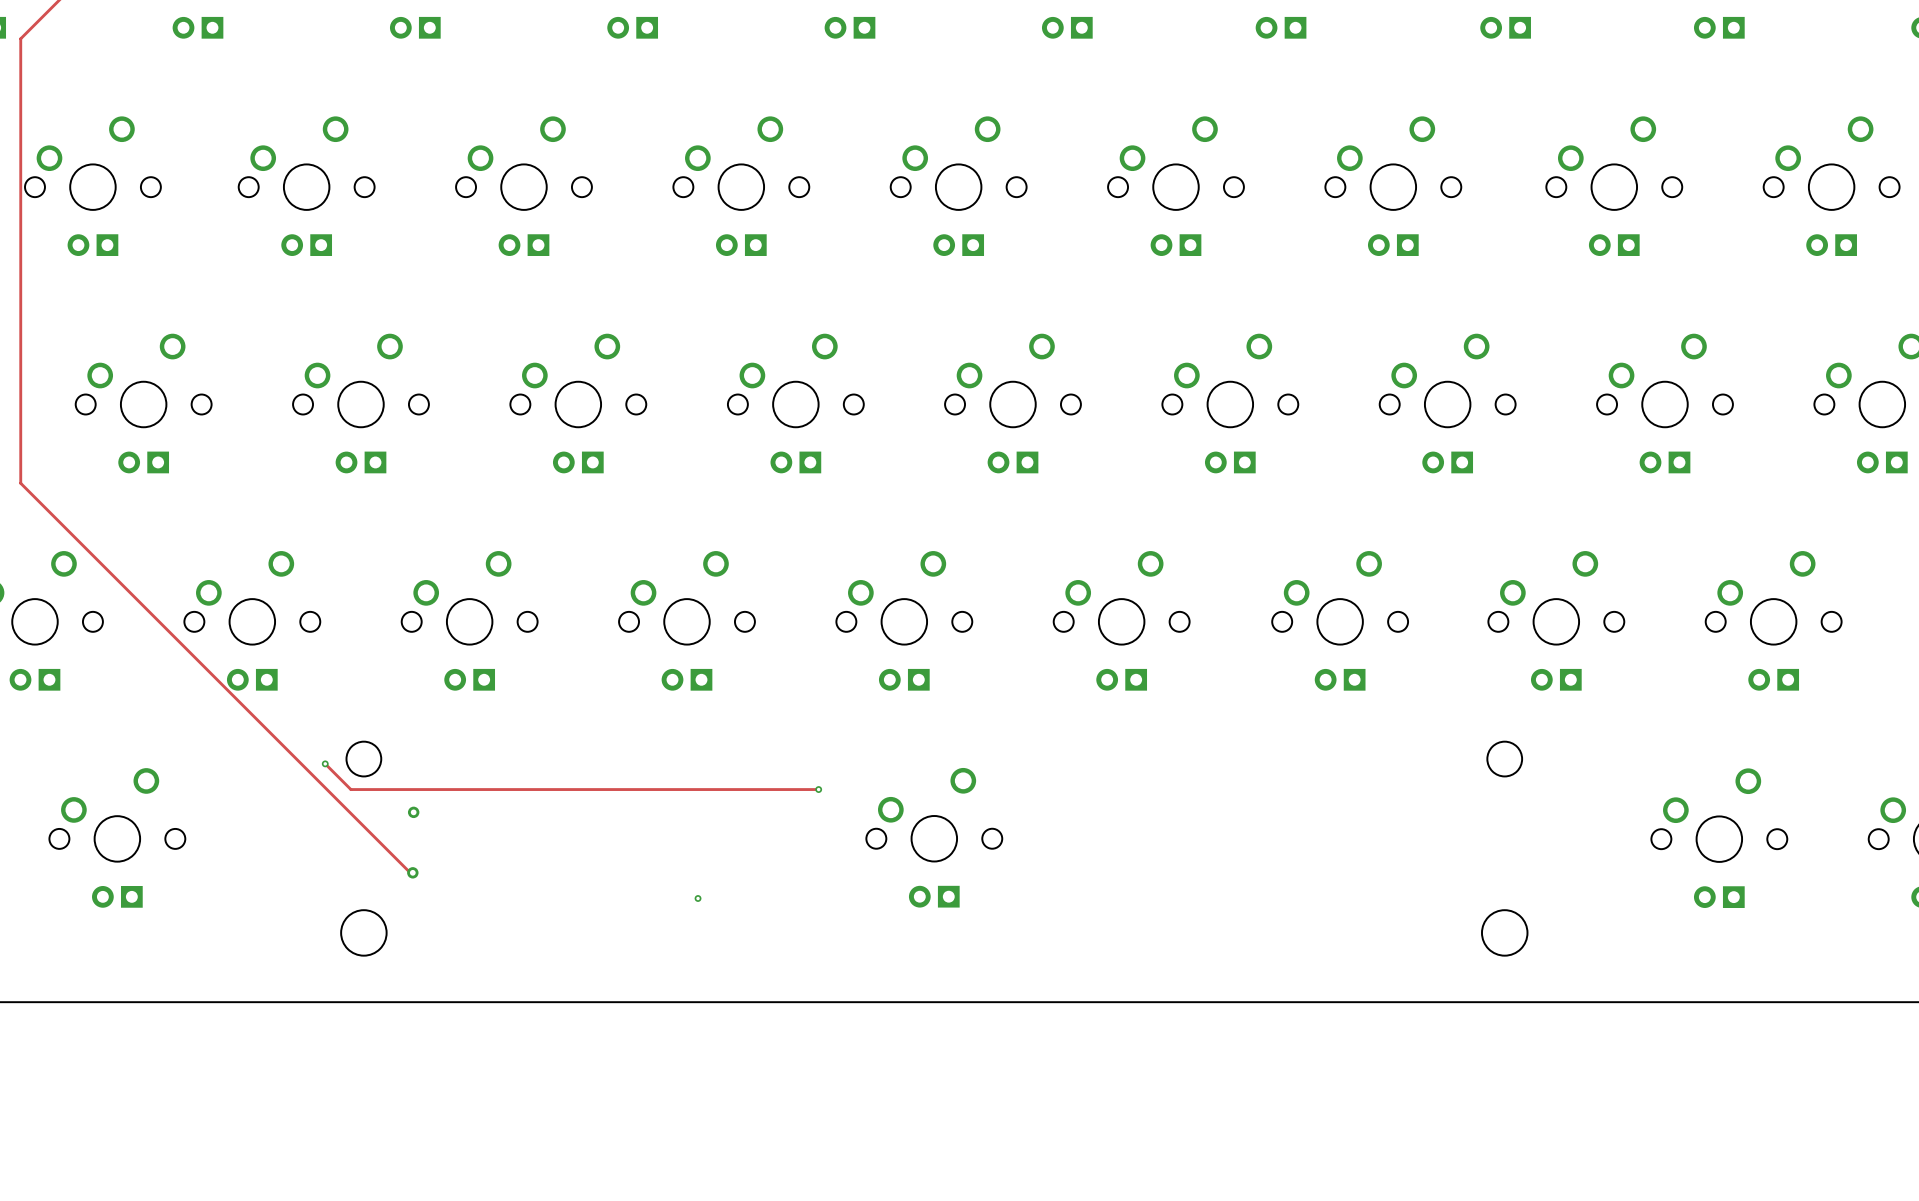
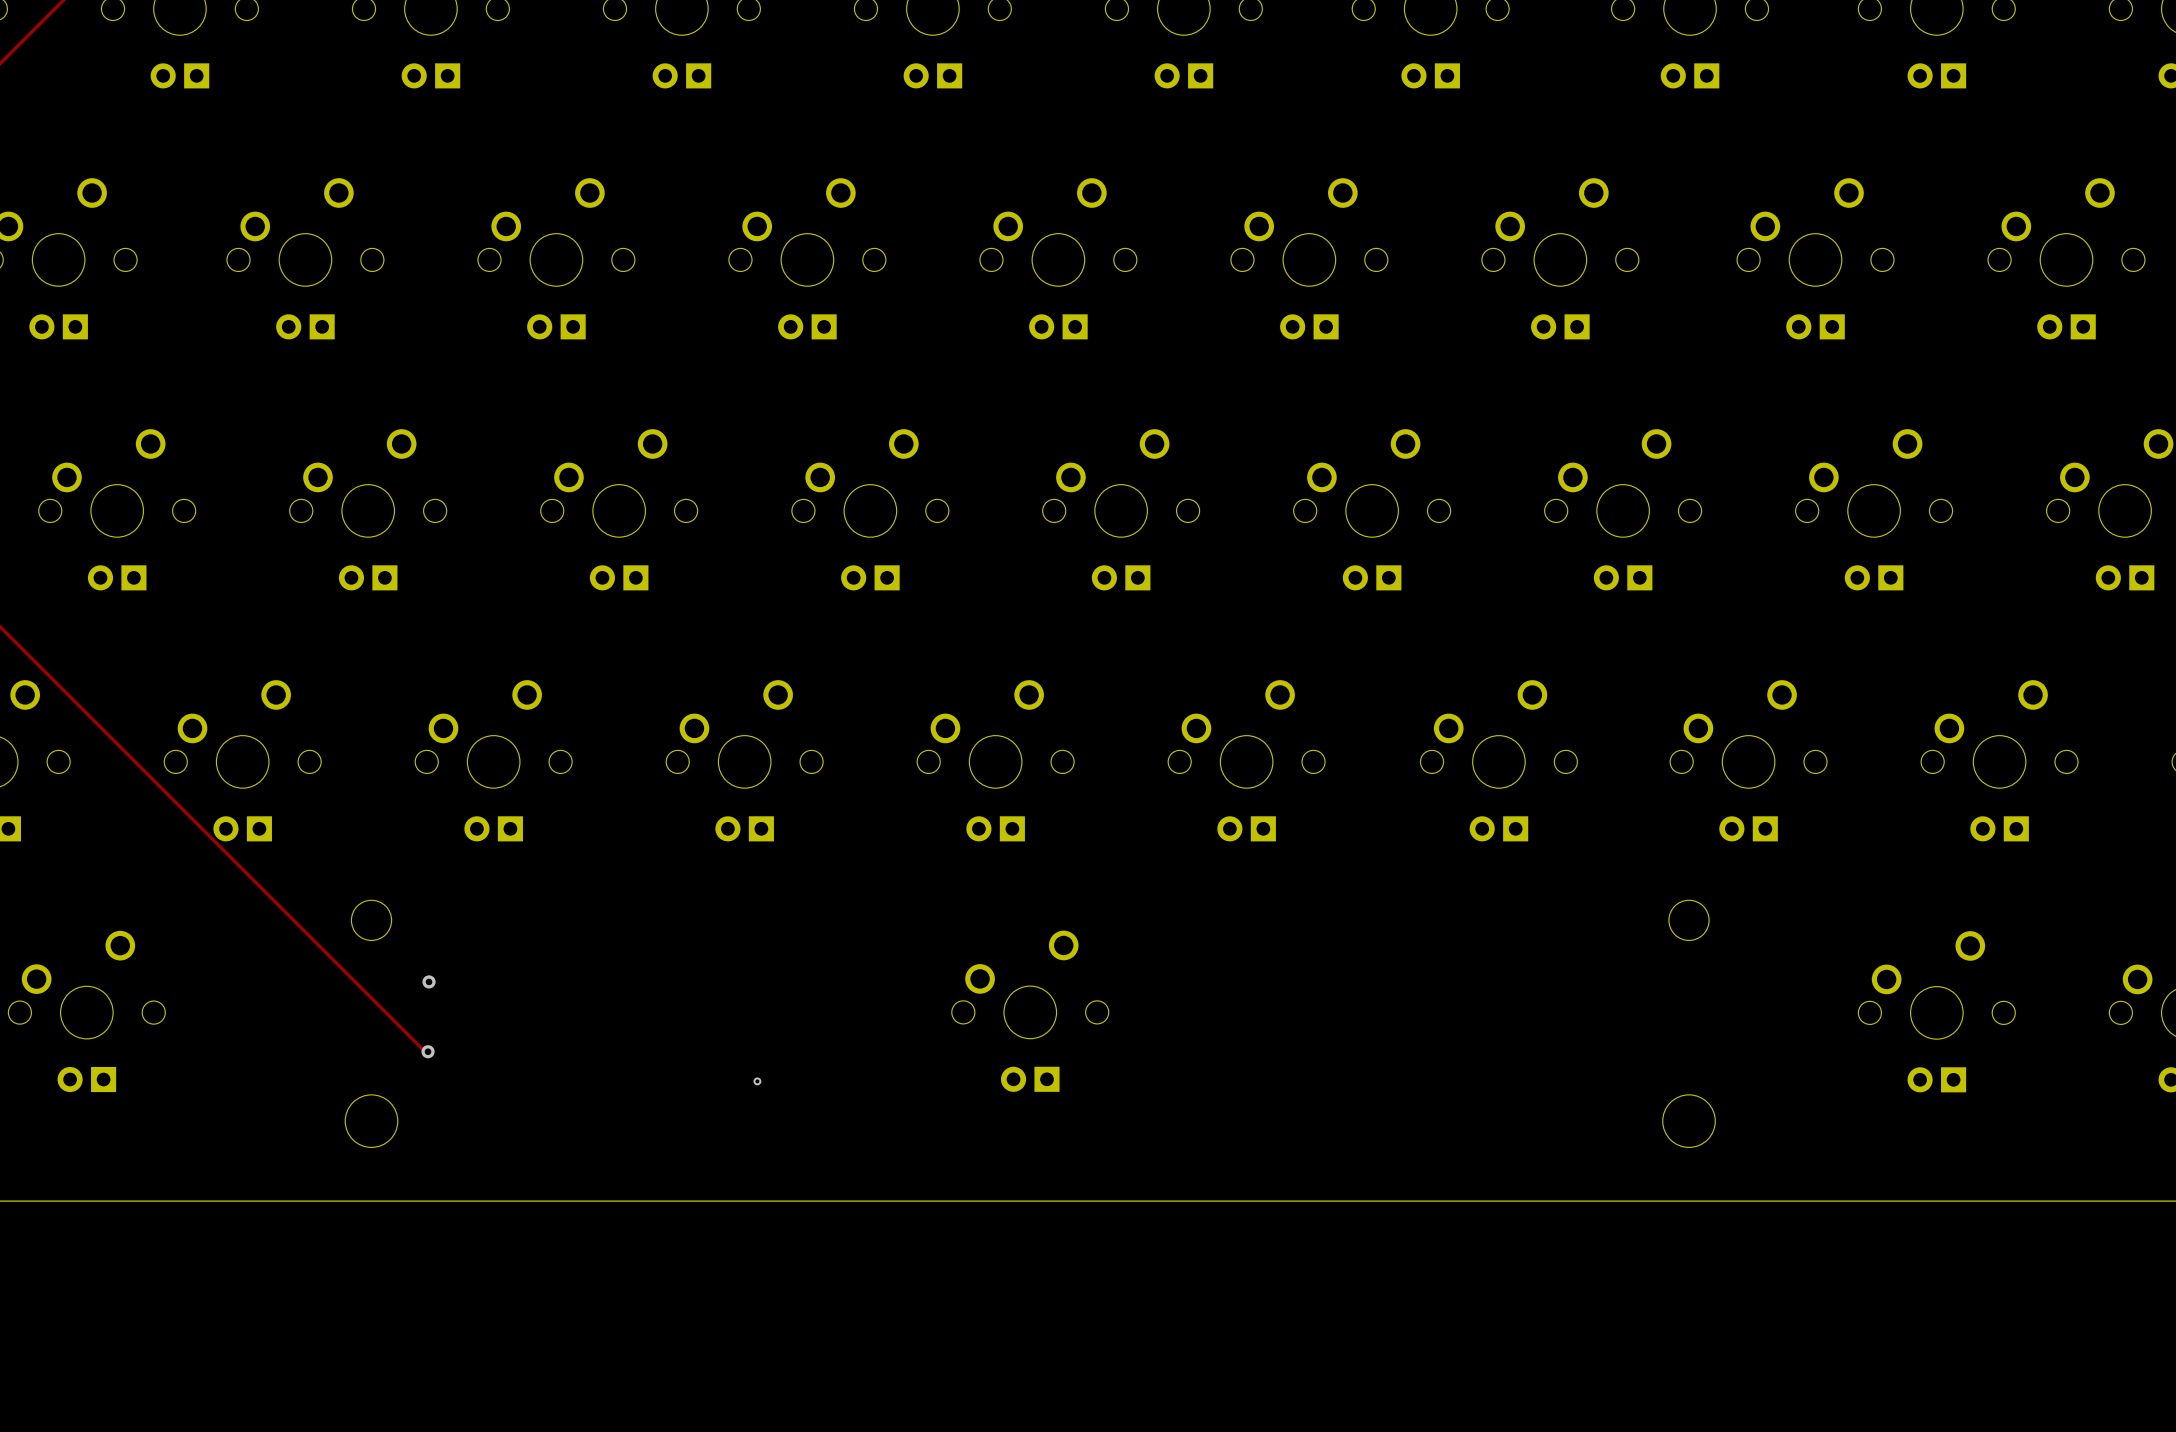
track: (325, 763) (350, 789) (818, 789) -> none
via: (325, 763) -> none
via: (818, 789) -> none

